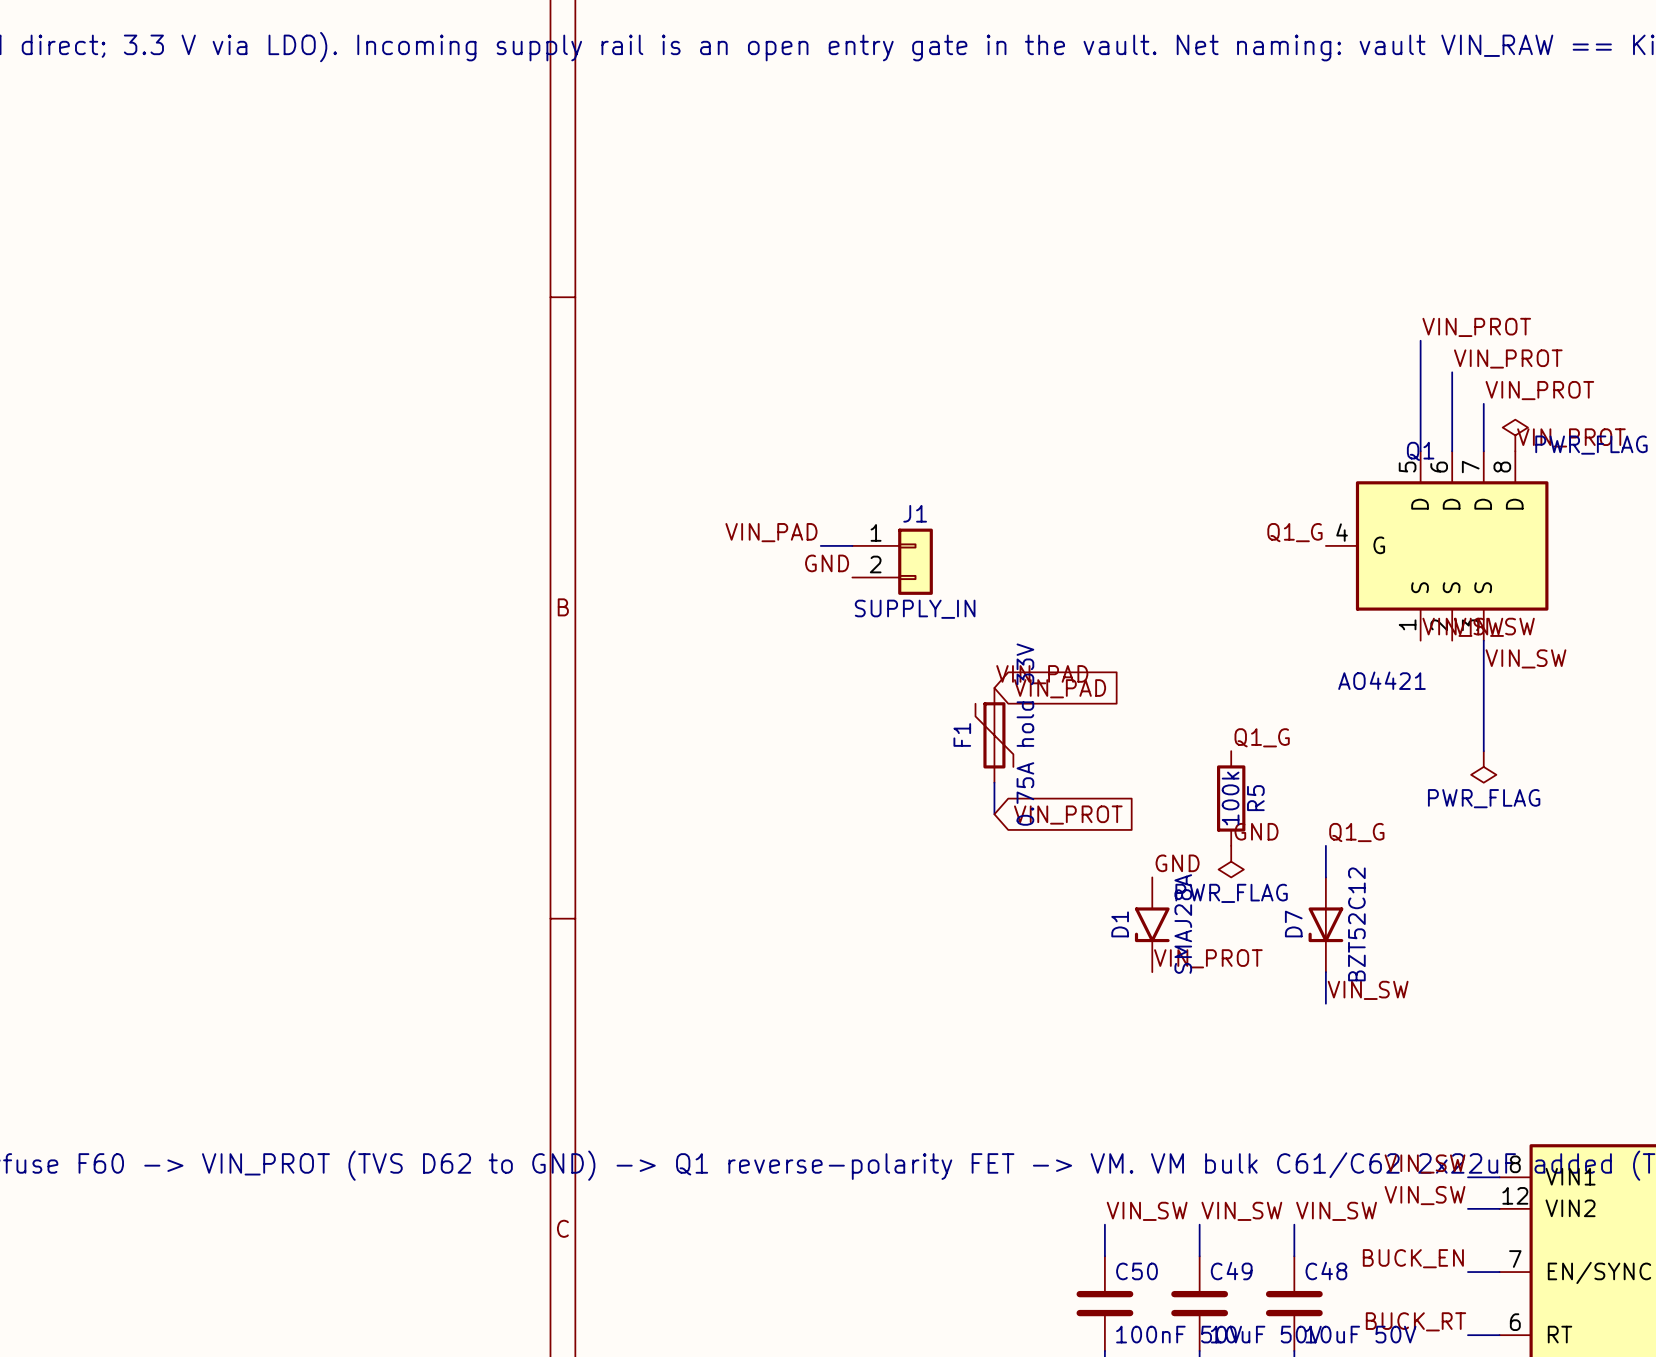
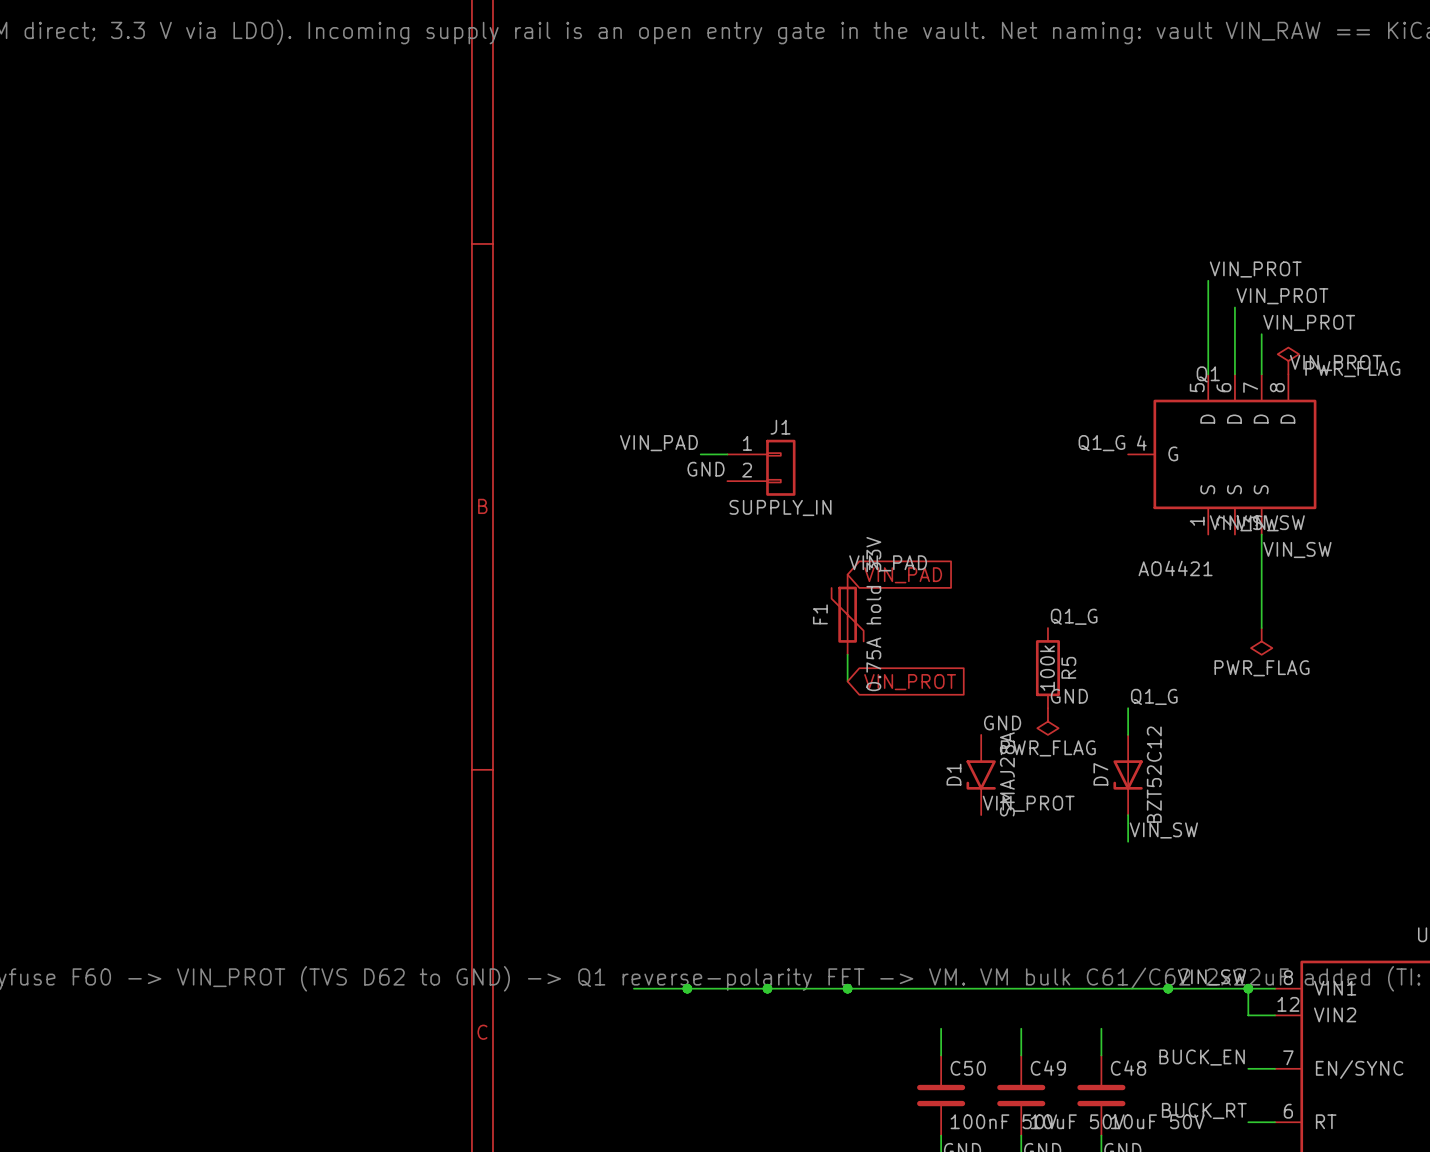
wire: none -> (633, 988) (1248, 988) (1248, 1015)
junction: none -> (687, 988)
junction: none -> (767, 988)
junction: none -> (847, 988)
junction: none -> (1168, 988)
junction: none -> (1248, 988)
label: VIN_SW (1425, 1195) -> none
label: VIN_SW (1147, 1211) -> none
label: VIN_SW (1241, 1211) -> none
label: VIN_SW (1336, 1211) -> none

